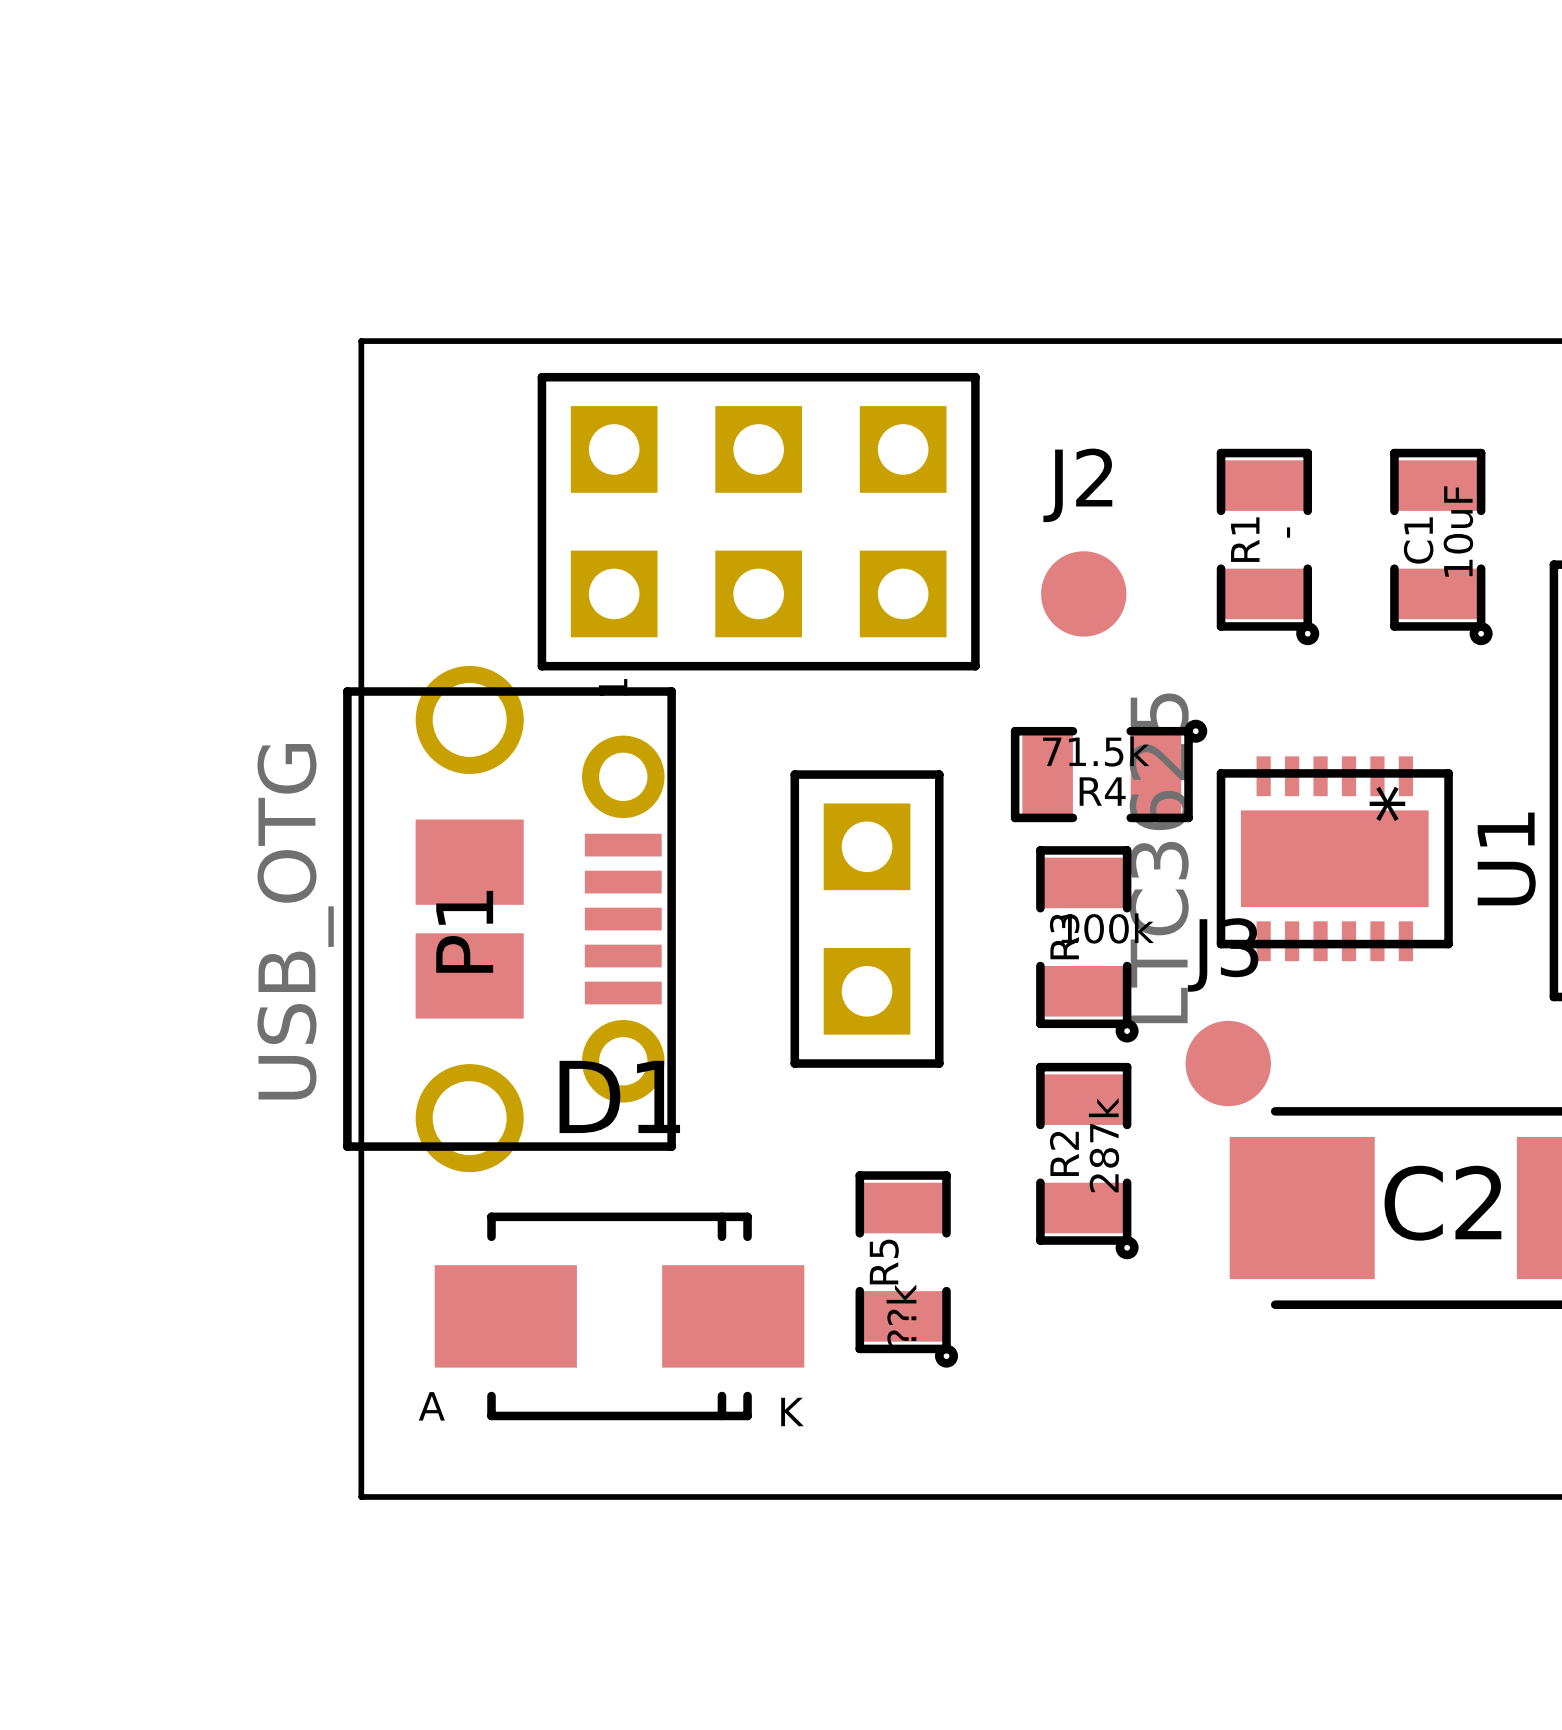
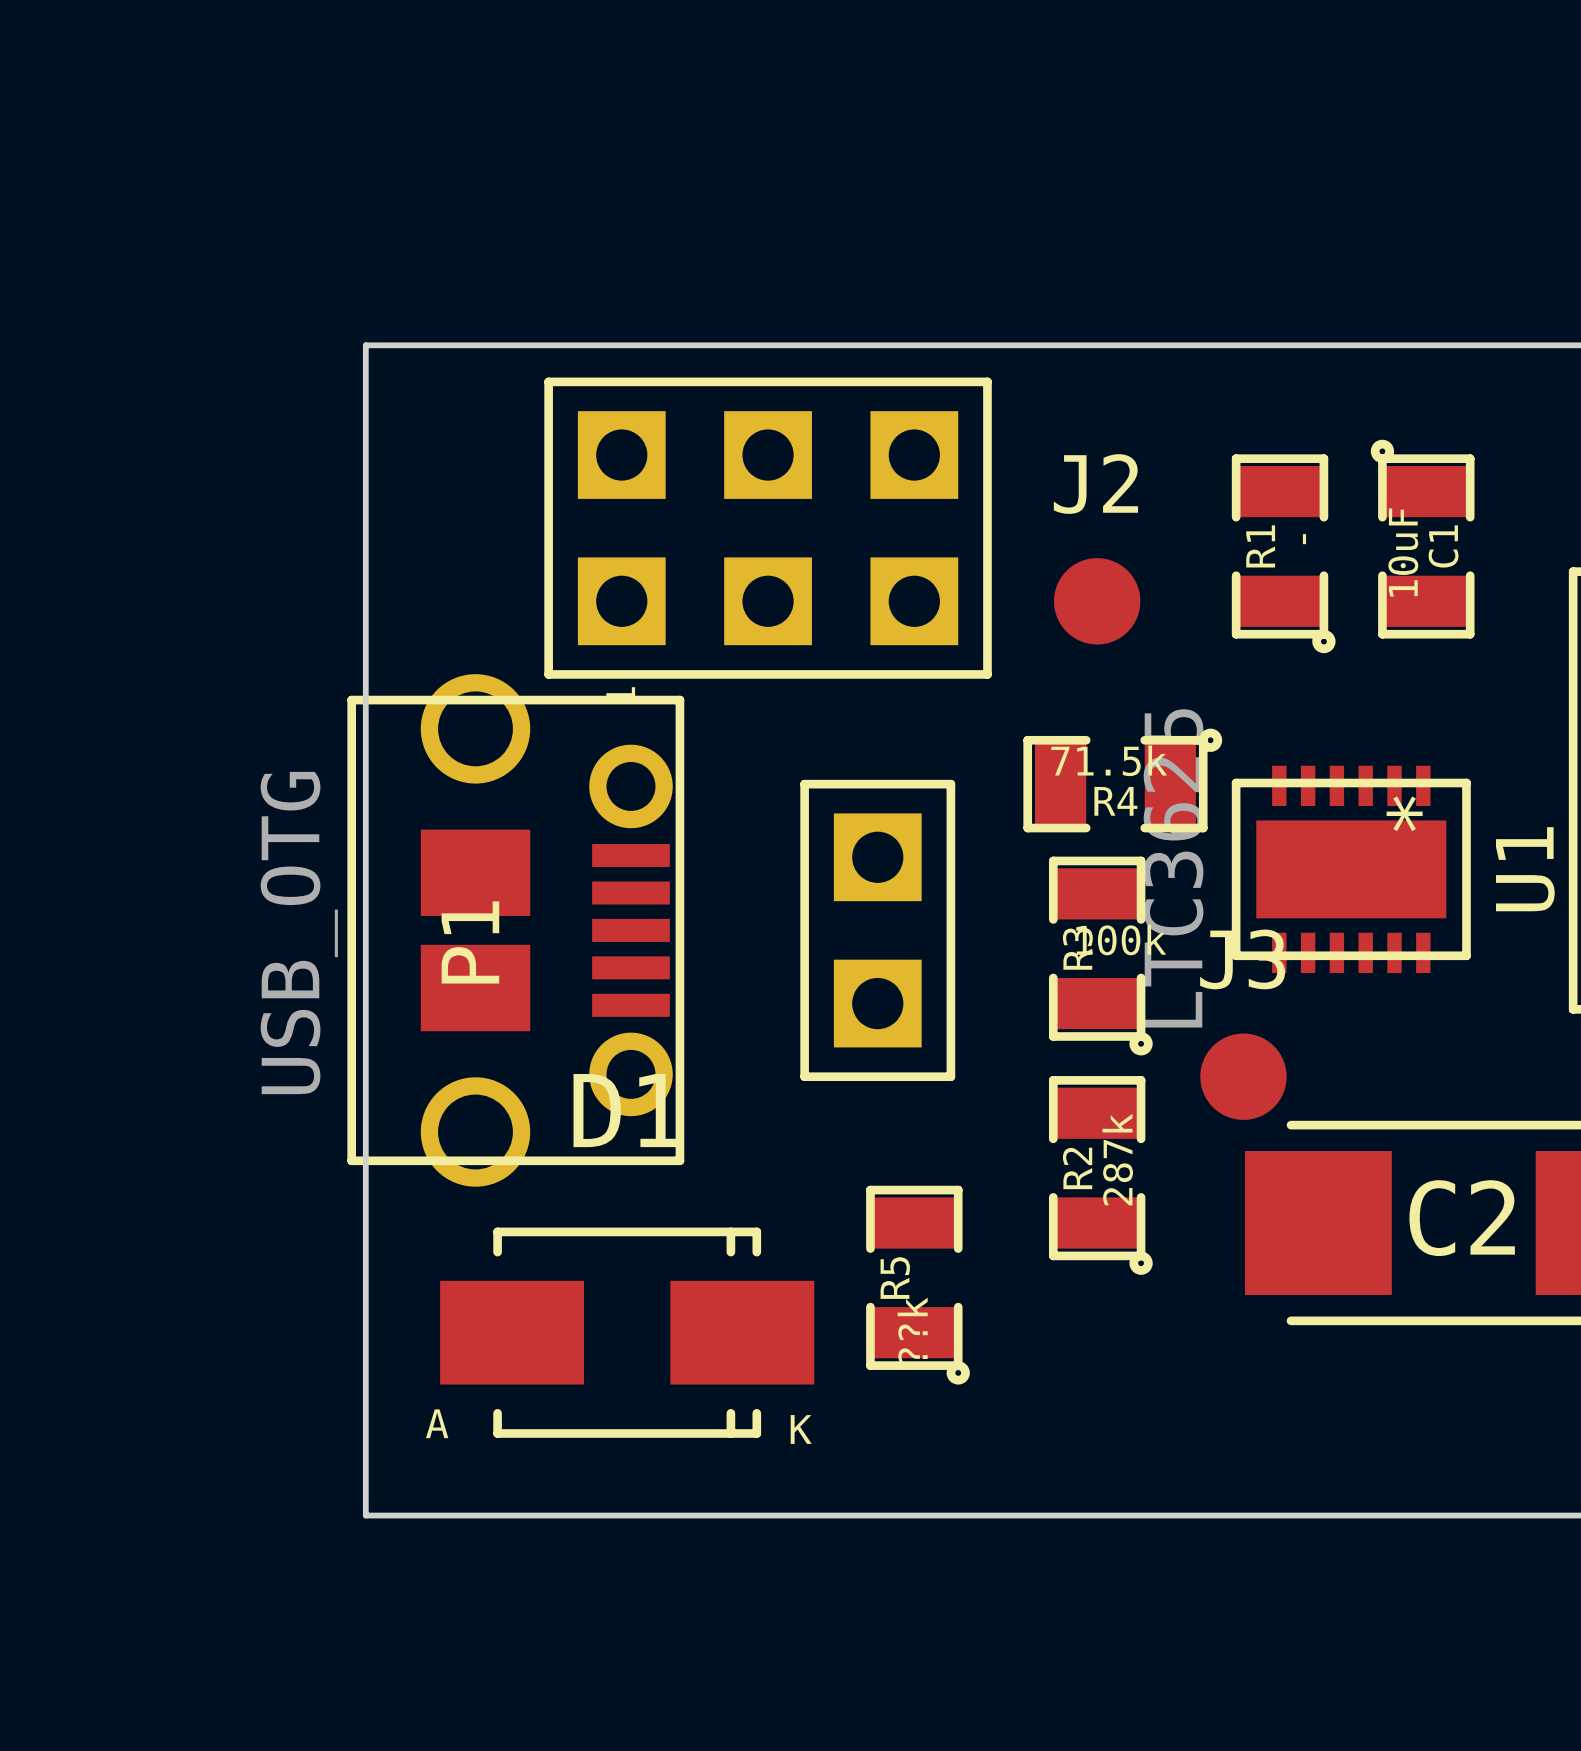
C1 rotation: 0° (1441, 546) -> 180° (1422, 539)

